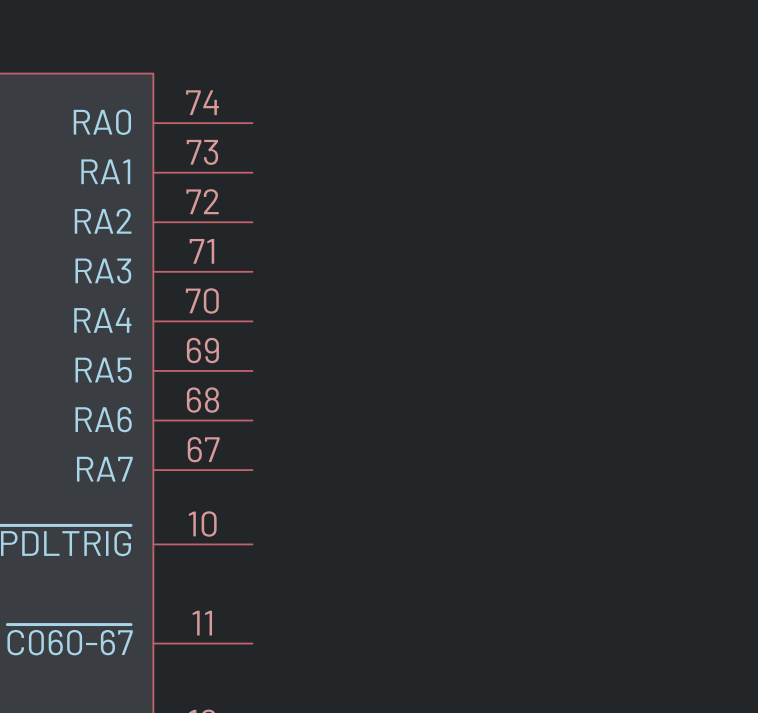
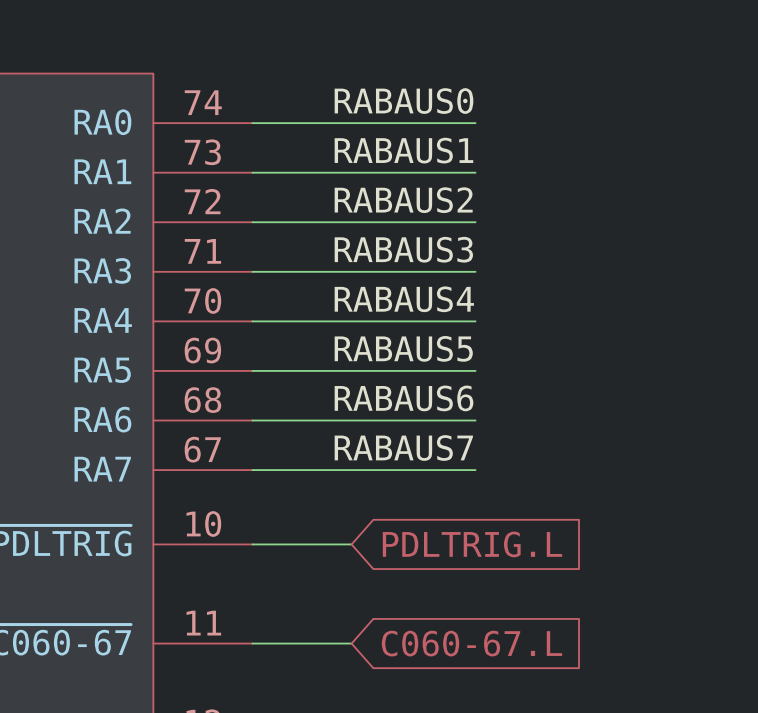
label: none -> RABAUS0 (404, 101)
wire: none -> (252, 123) (475, 123)
label: none -> RABAUS1 (403, 150)
wire: none -> (252, 172) (475, 172)
label: none -> RABAUS2 (403, 200)
wire: none -> (252, 222) (475, 222)
label: none -> RABAUS3 (403, 249)
wire: none -> (252, 271) (475, 271)
label: none -> RABAUS4 (404, 299)
wire: none -> (252, 321) (475, 321)
label: none -> RABAUS5 (403, 348)
wire: none -> (252, 370) (475, 370)
label: none -> RABAUS6 (404, 398)
wire: none -> (252, 420) (475, 420)
label: none -> RABAUS7 (403, 447)
wire: none -> (252, 470) (475, 470)
wire: none -> (252, 544) (351, 544)
global label: none -> PDLTRIG.L (472, 544)
wire: none -> (252, 643) (351, 643)
global label: none -> C060-67.L (471, 643)

